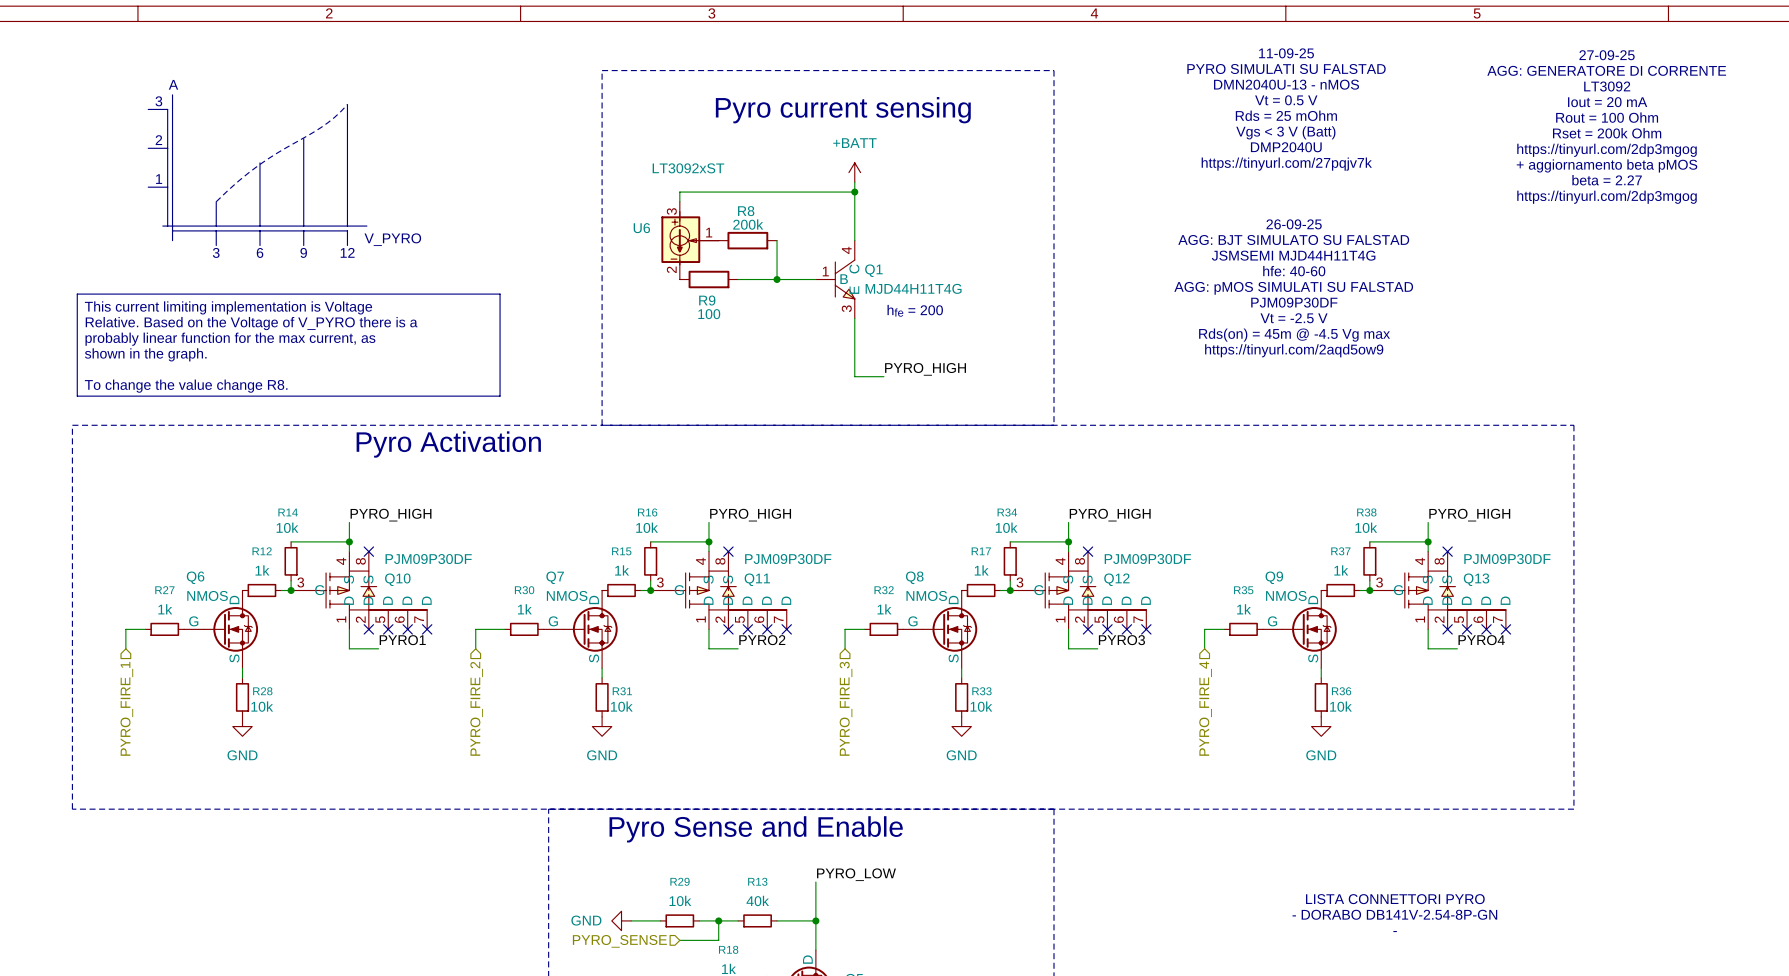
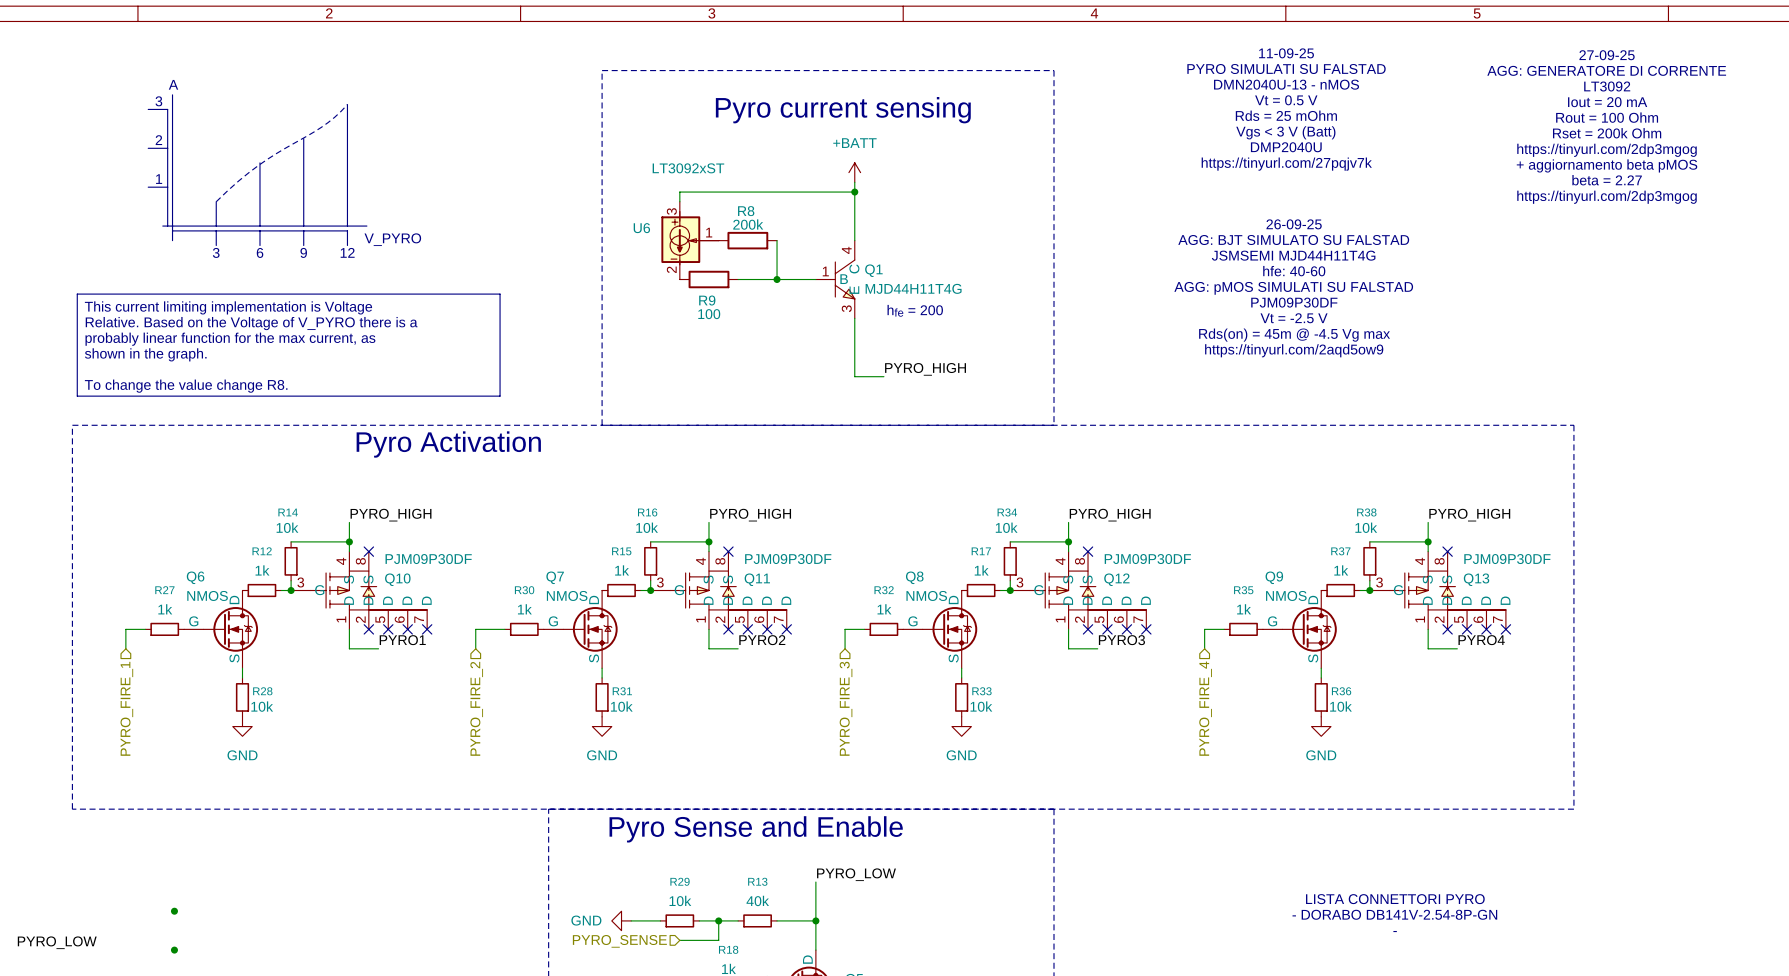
junction: none -> (174, 911)
label: none -> PYRO_LOW (57, 942)
junction: none -> (174, 950)

